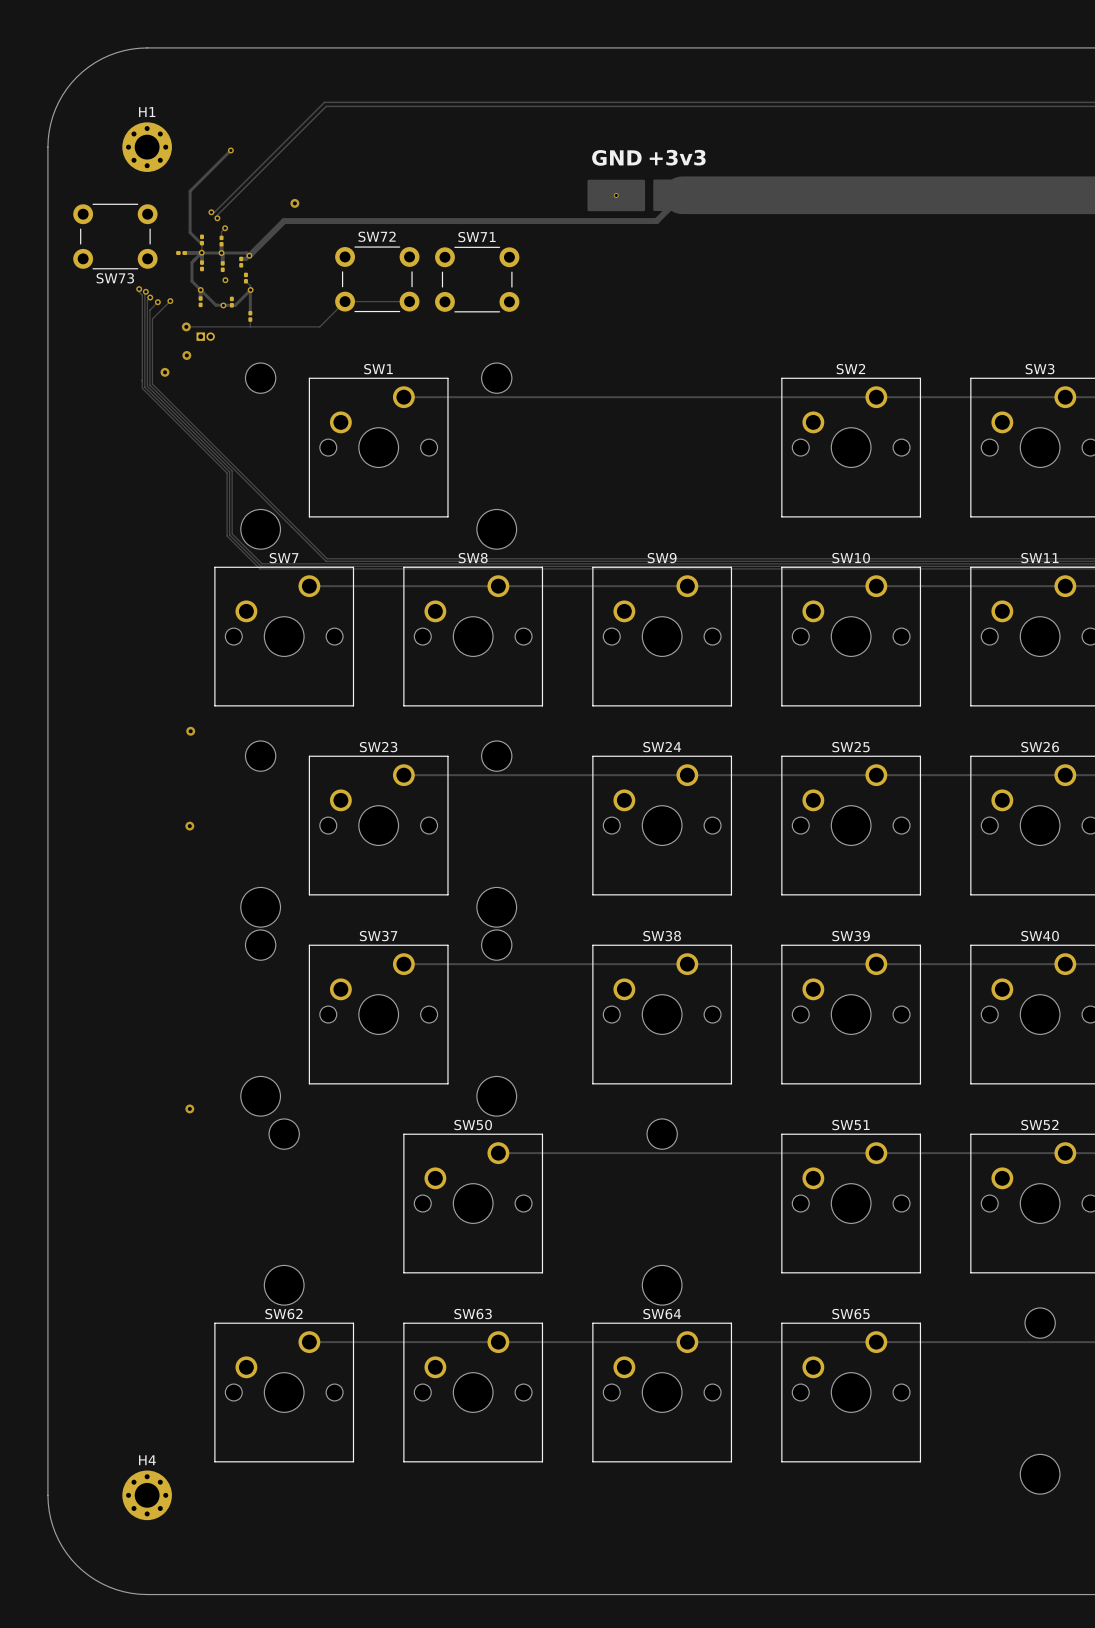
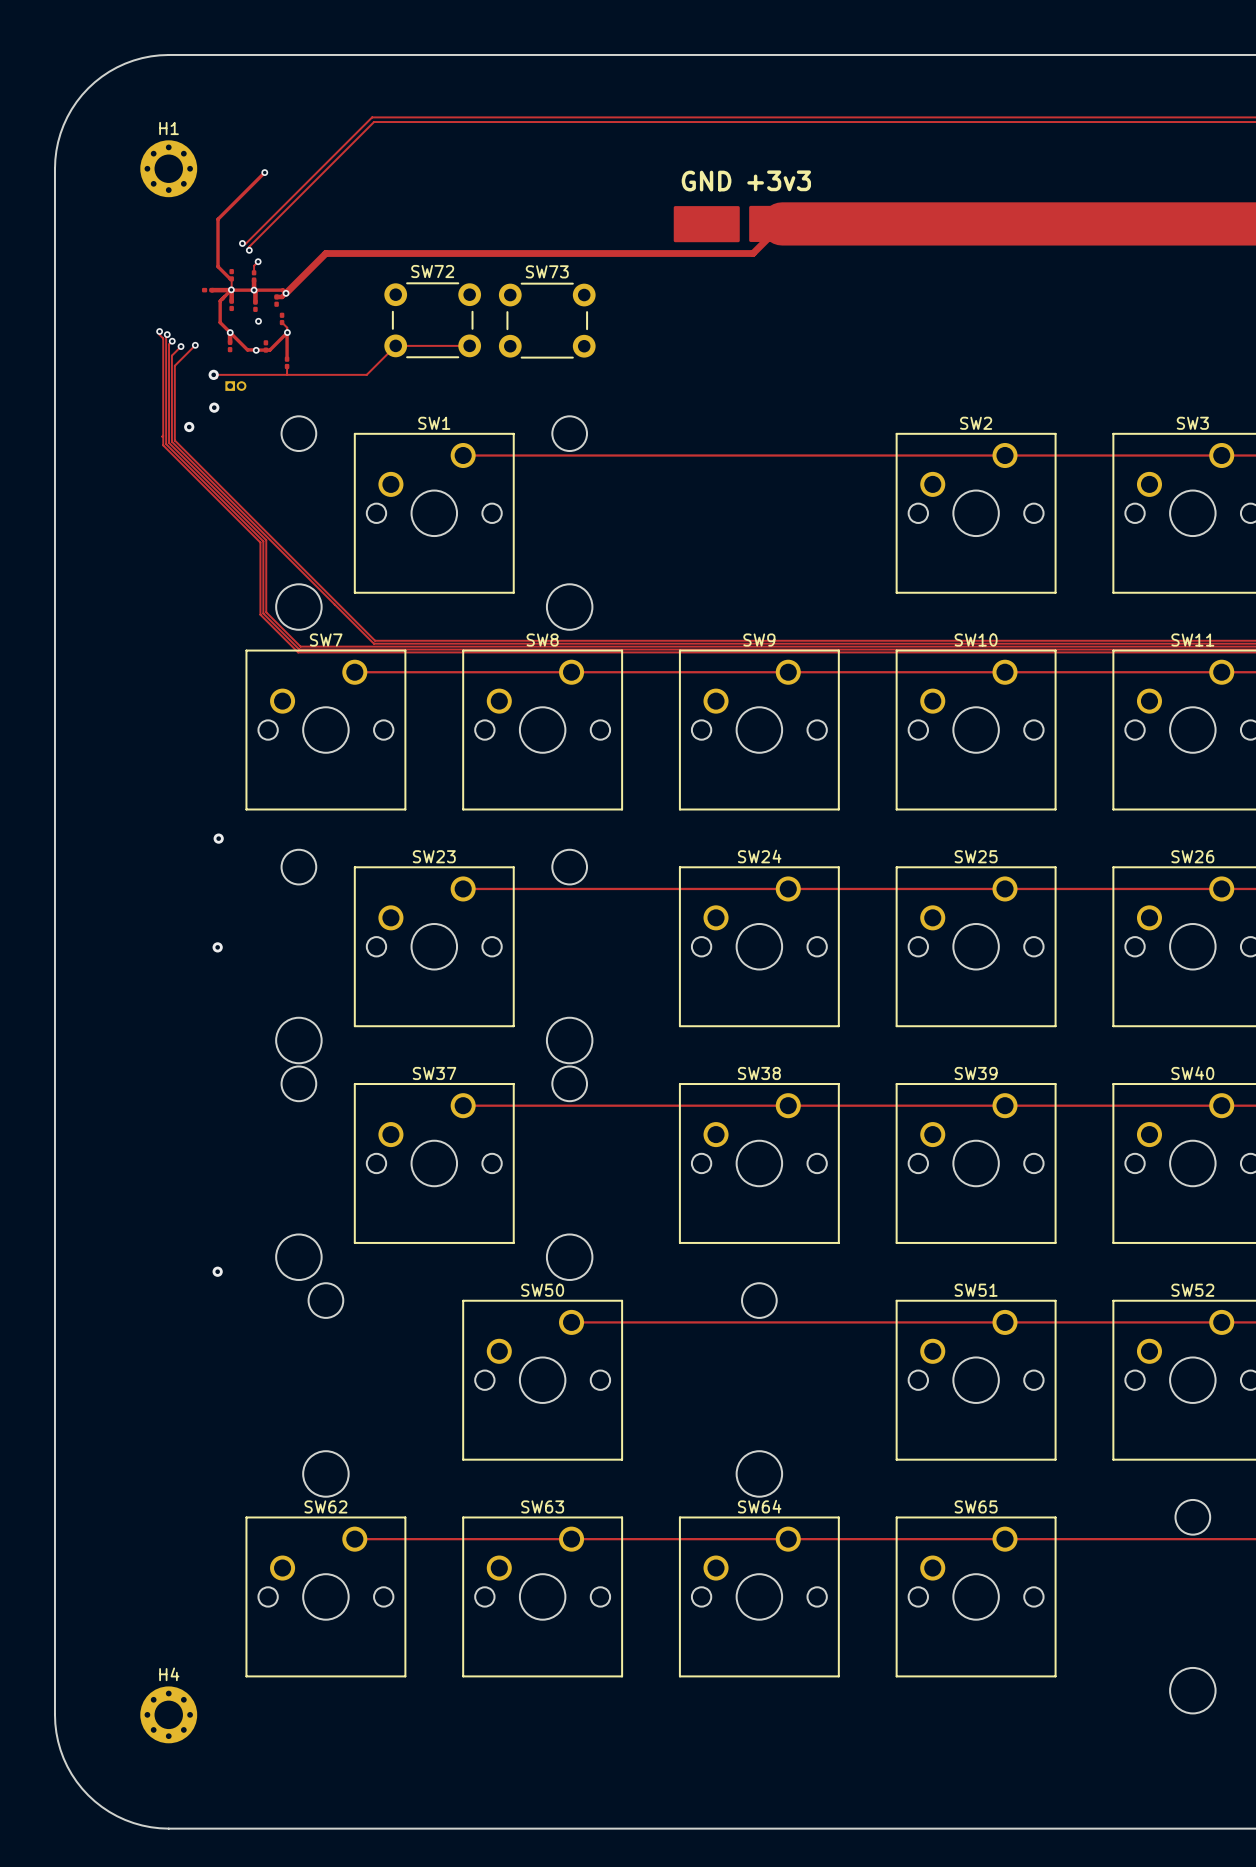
via: (616, 195) -> none
via: (294, 203) -> none
SW73: (115, 236) -> none
SW71 name: SW71 (477, 237) -> SW73 (547, 271)

